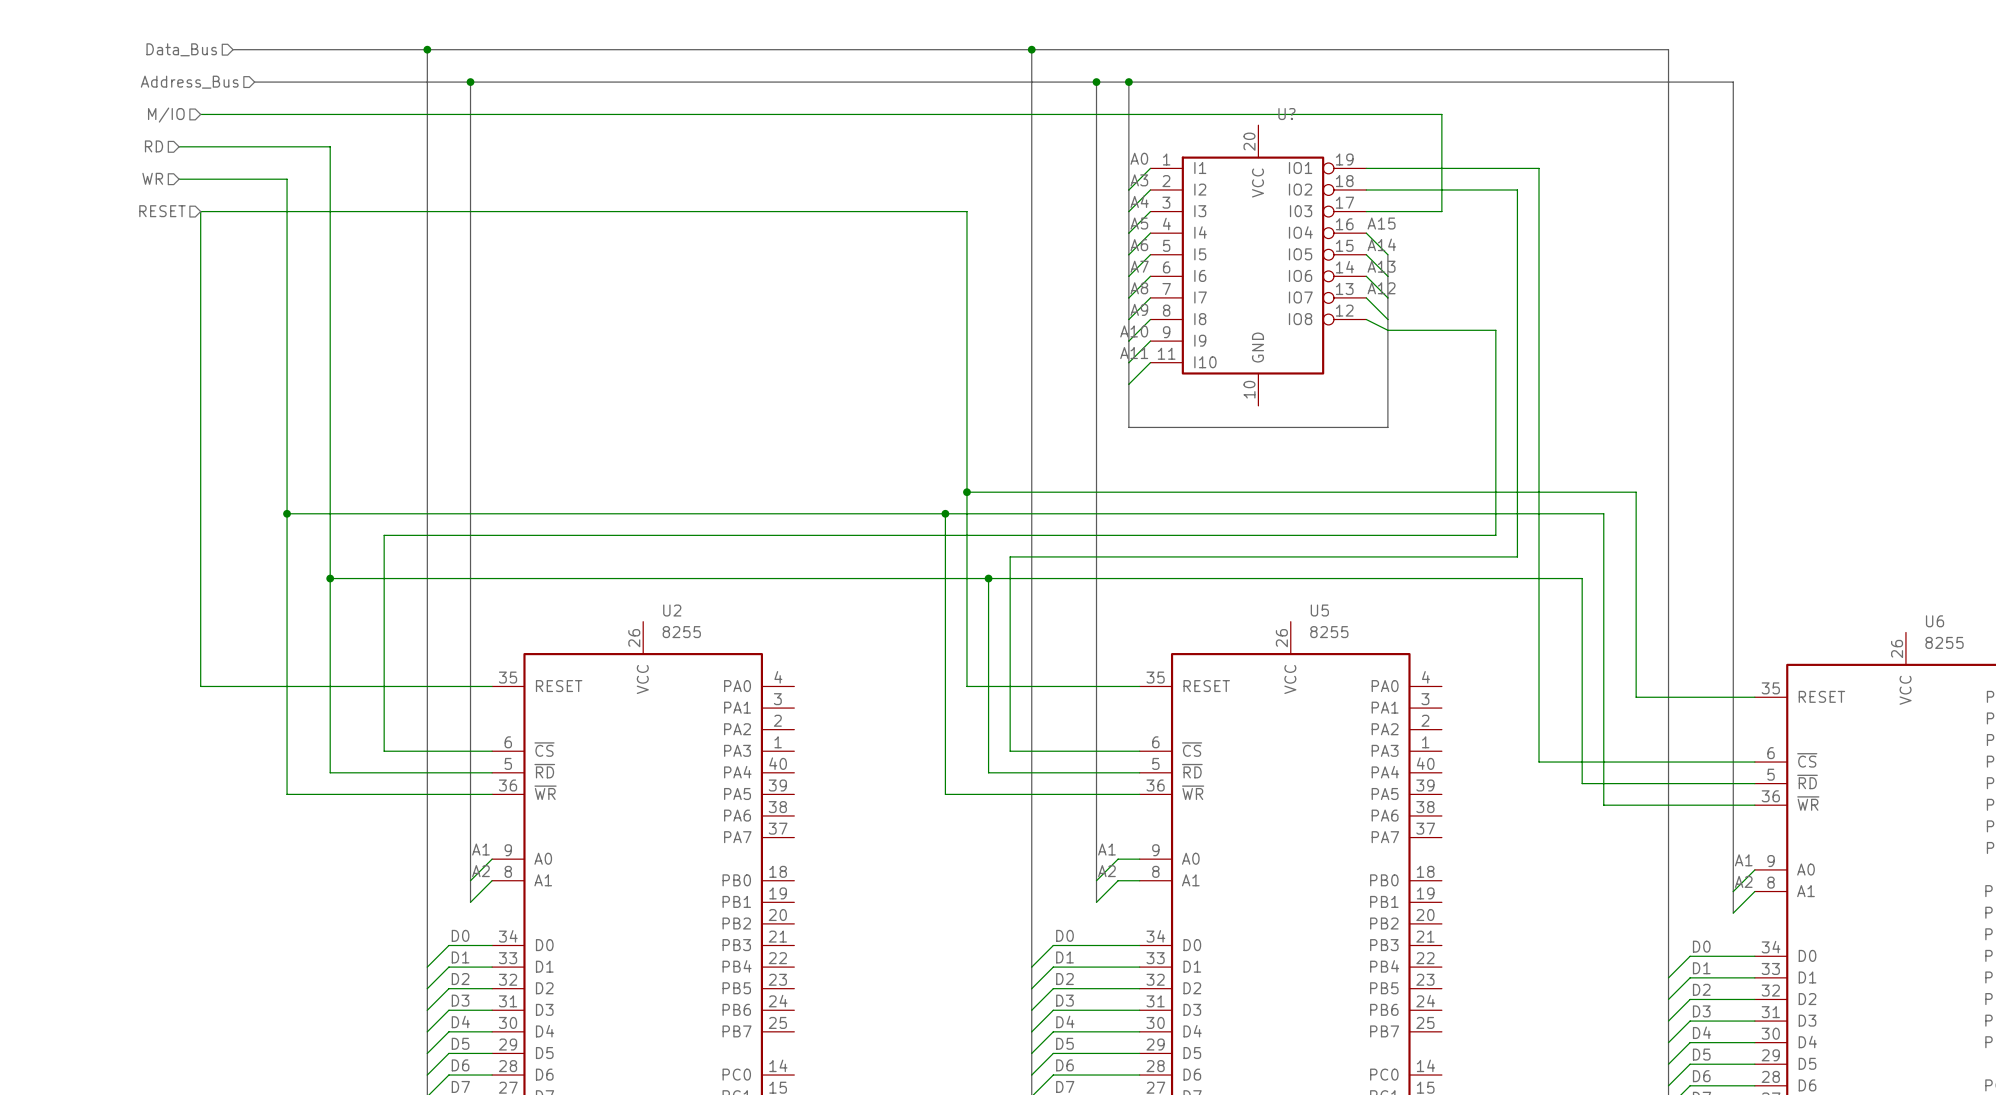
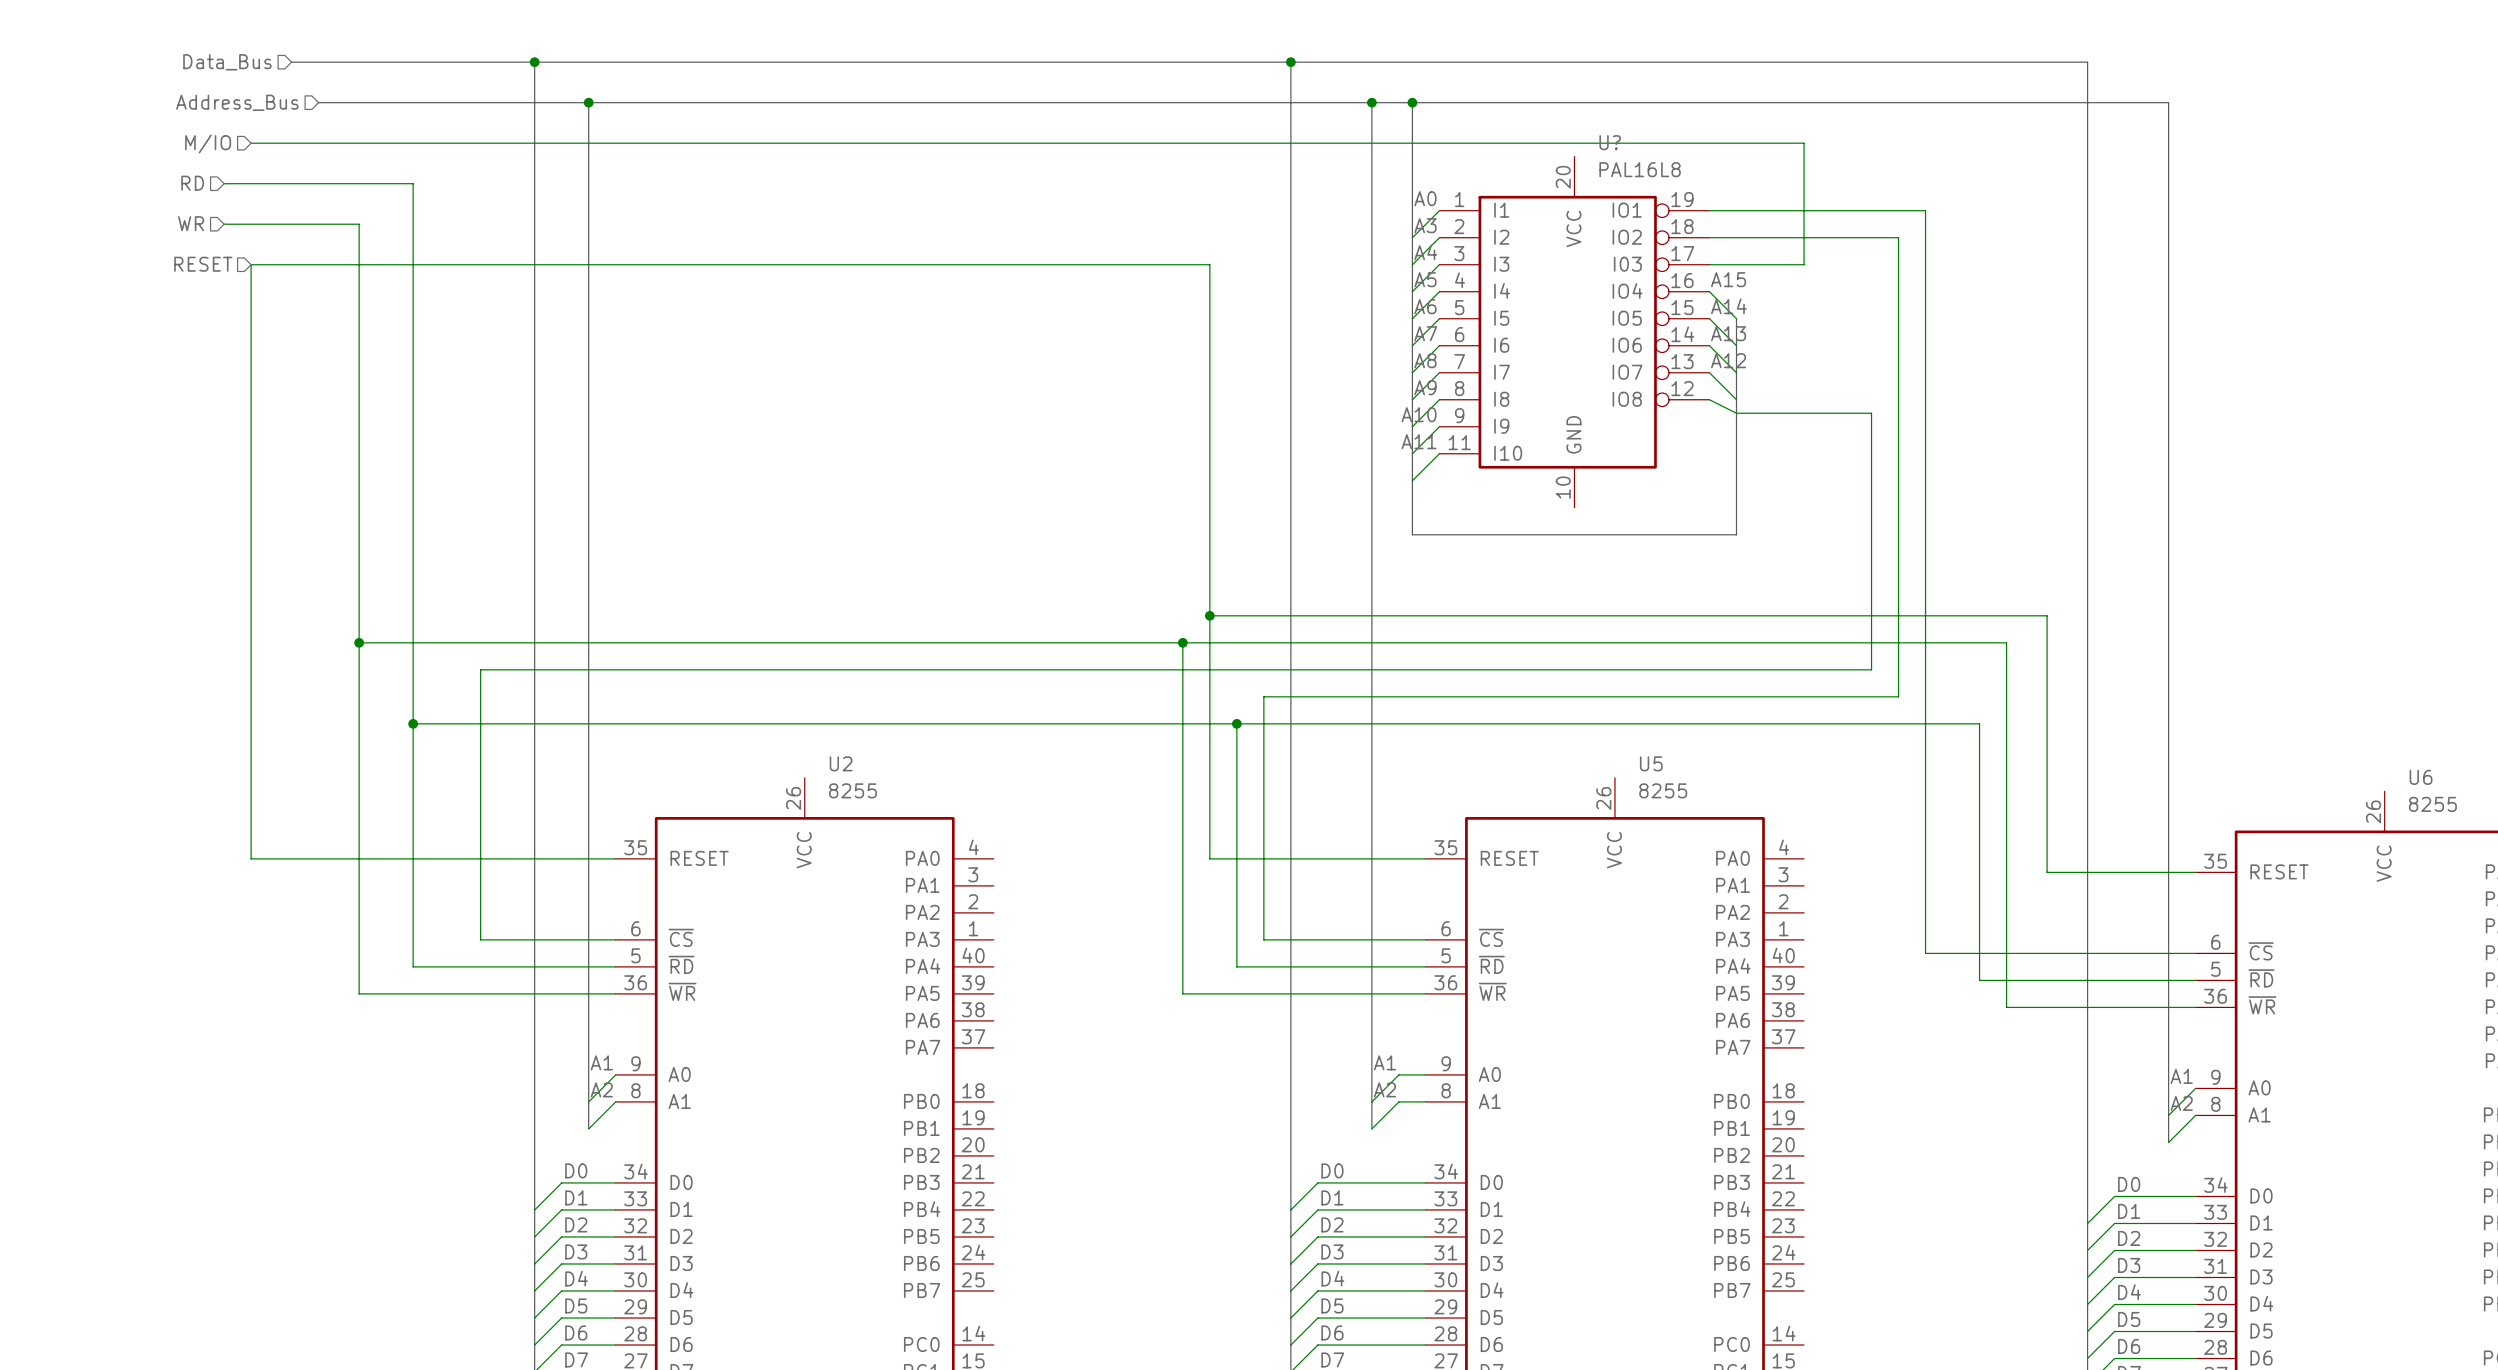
U? value: none -> PAL16L8 (1640, 169)

